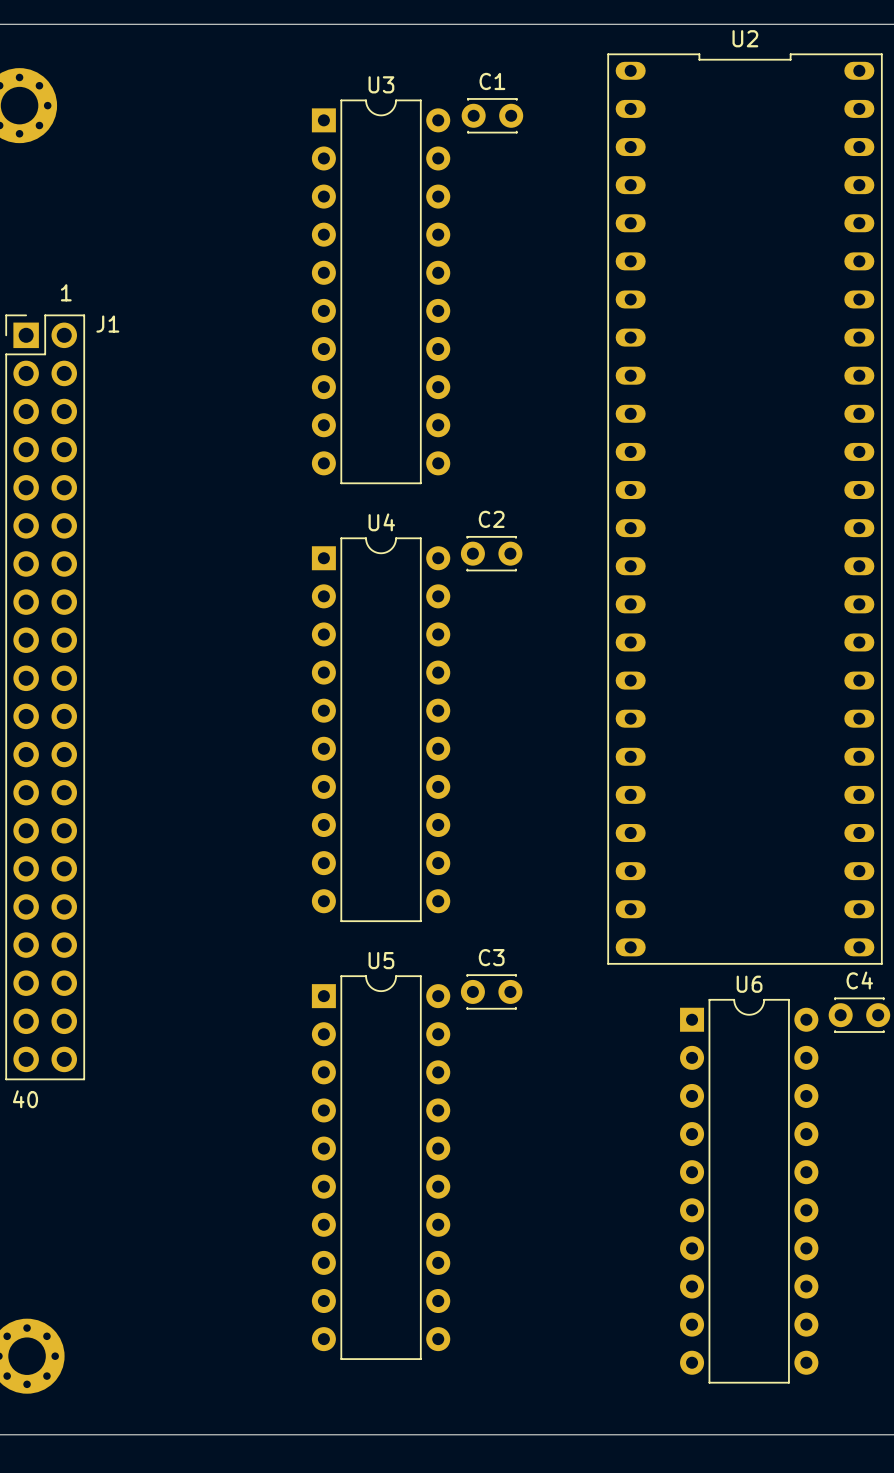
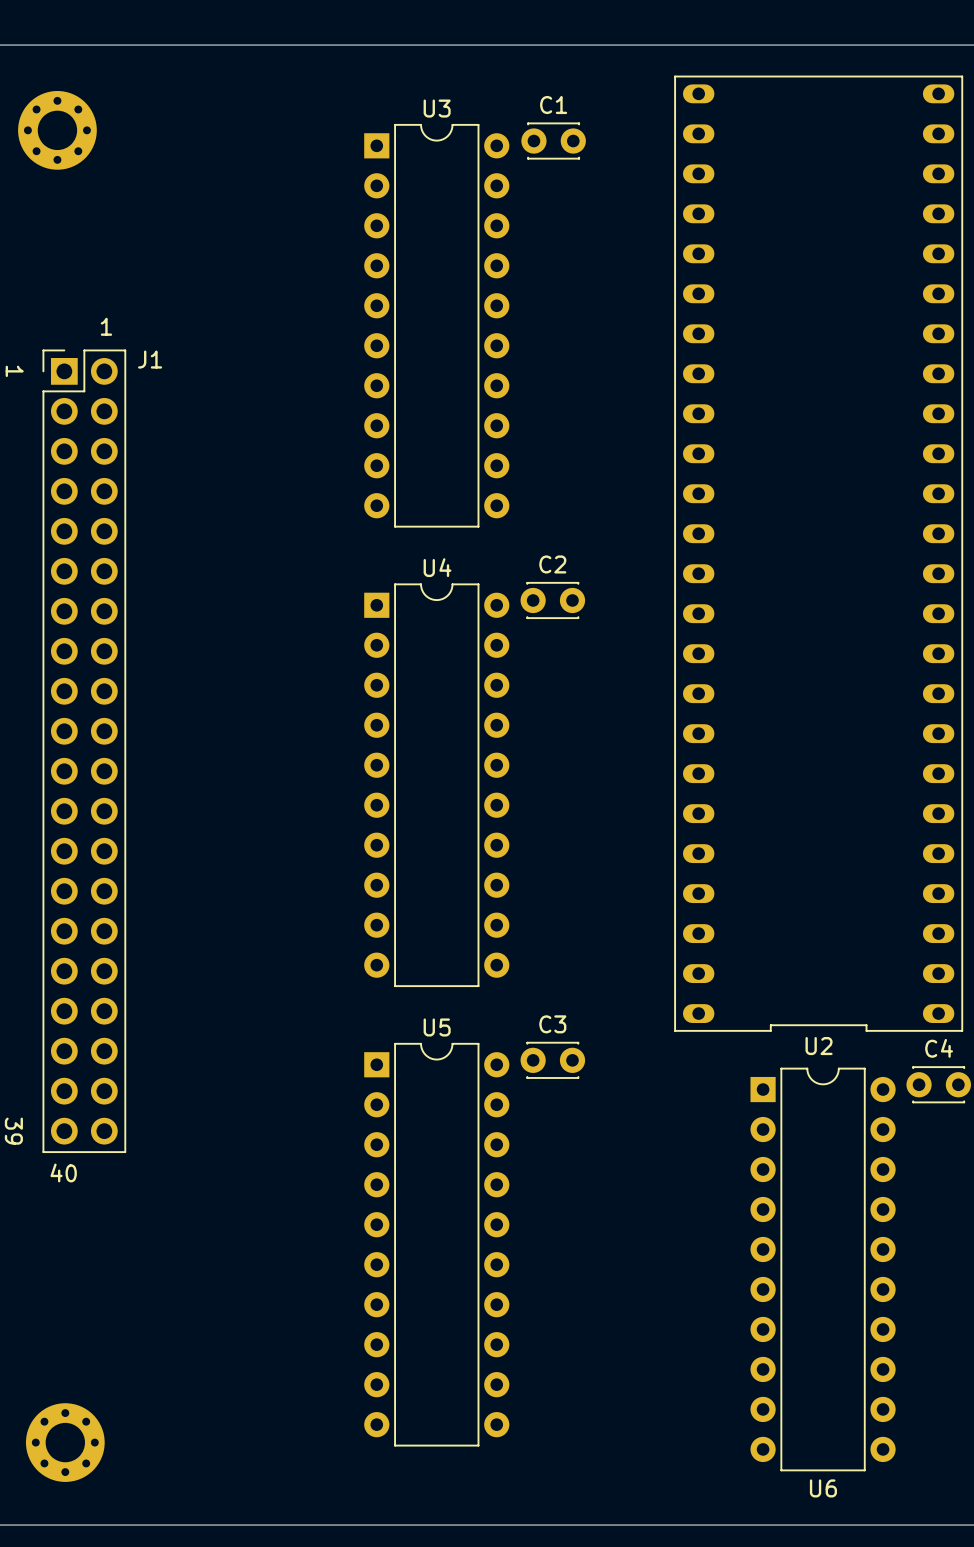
U2 rotation: 0° (745, 509) -> 180° (818, 553)
U6 name position: U6 (749, 984) -> U6 (823, 1488)

